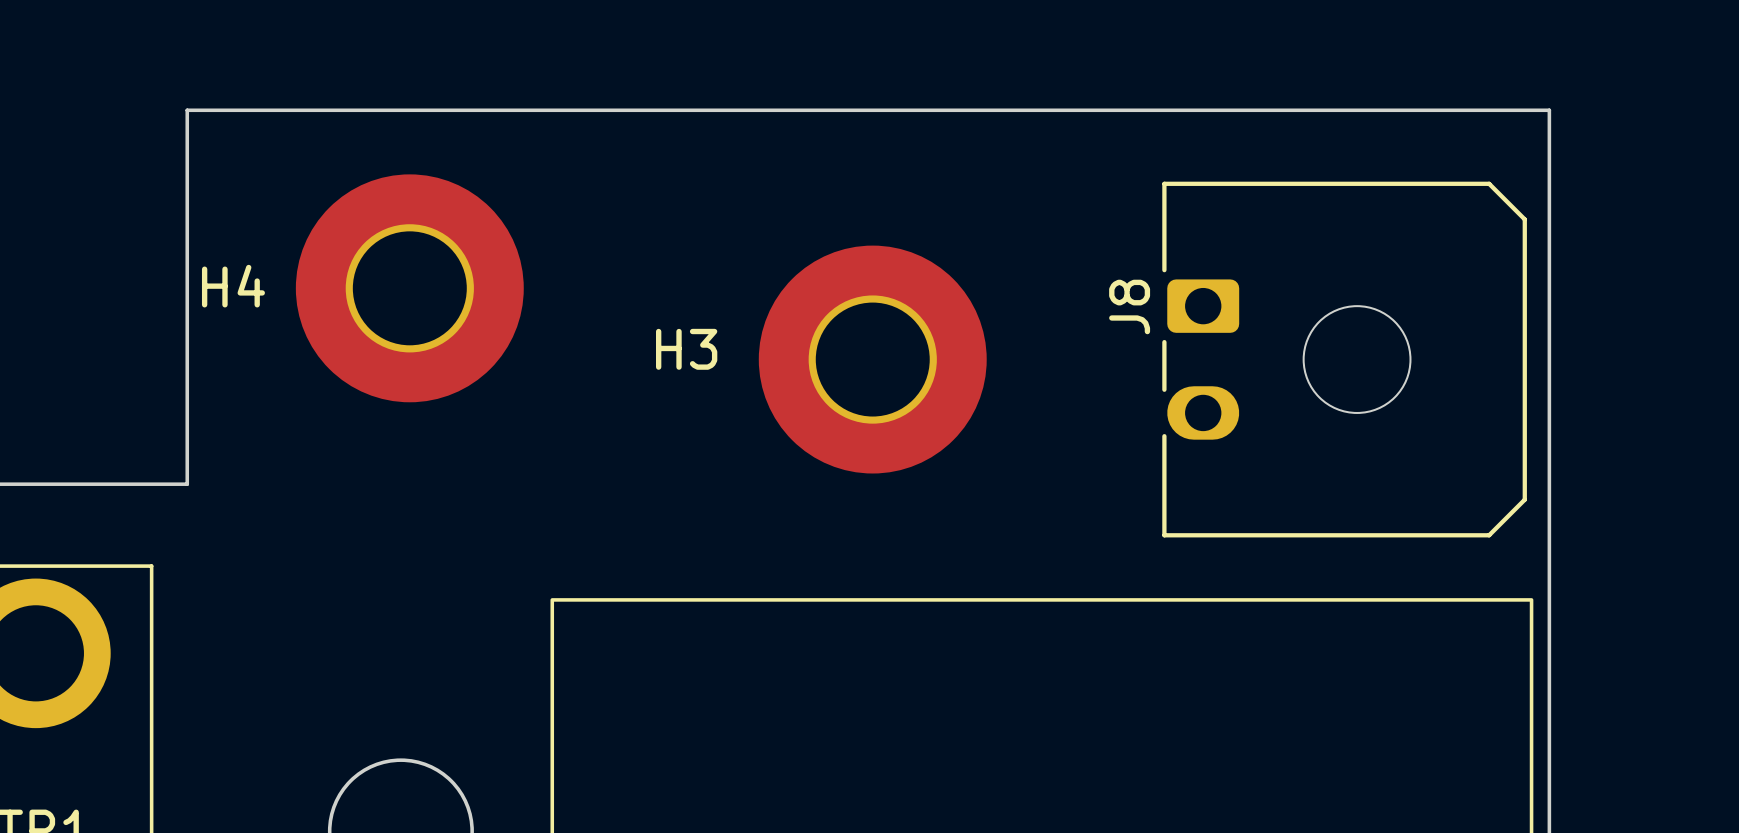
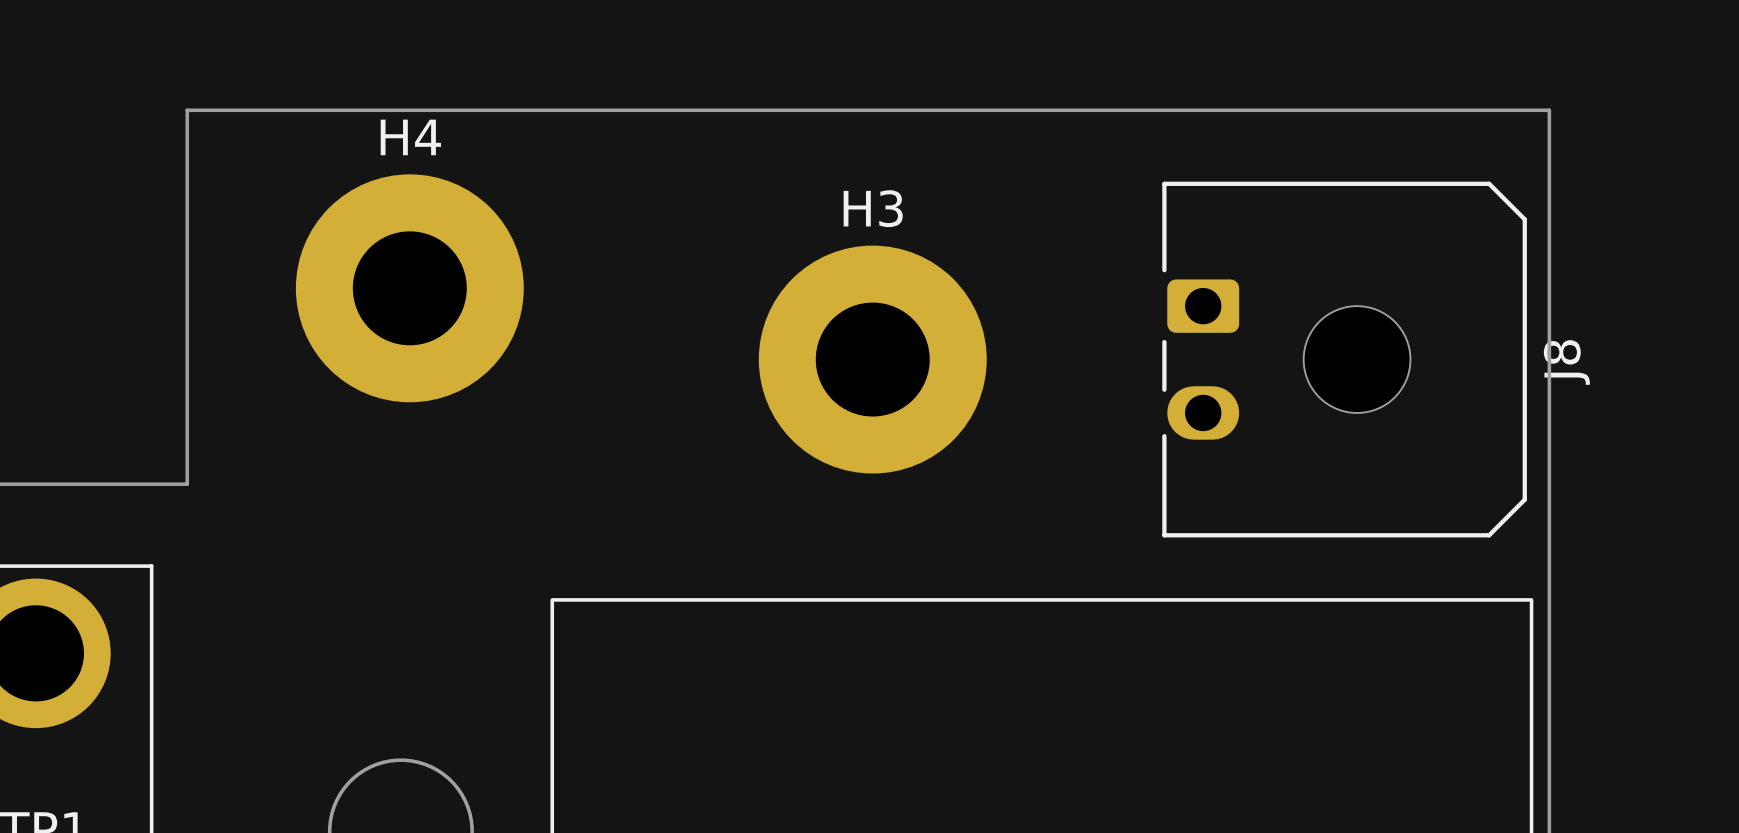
H4 name position: H4 (233, 286) -> H4 (410, 137)
J8 name position: J8 (1129, 306) -> J8 (1566, 362)
H3 name position: H3 (686, 349) -> H3 (873, 208)

